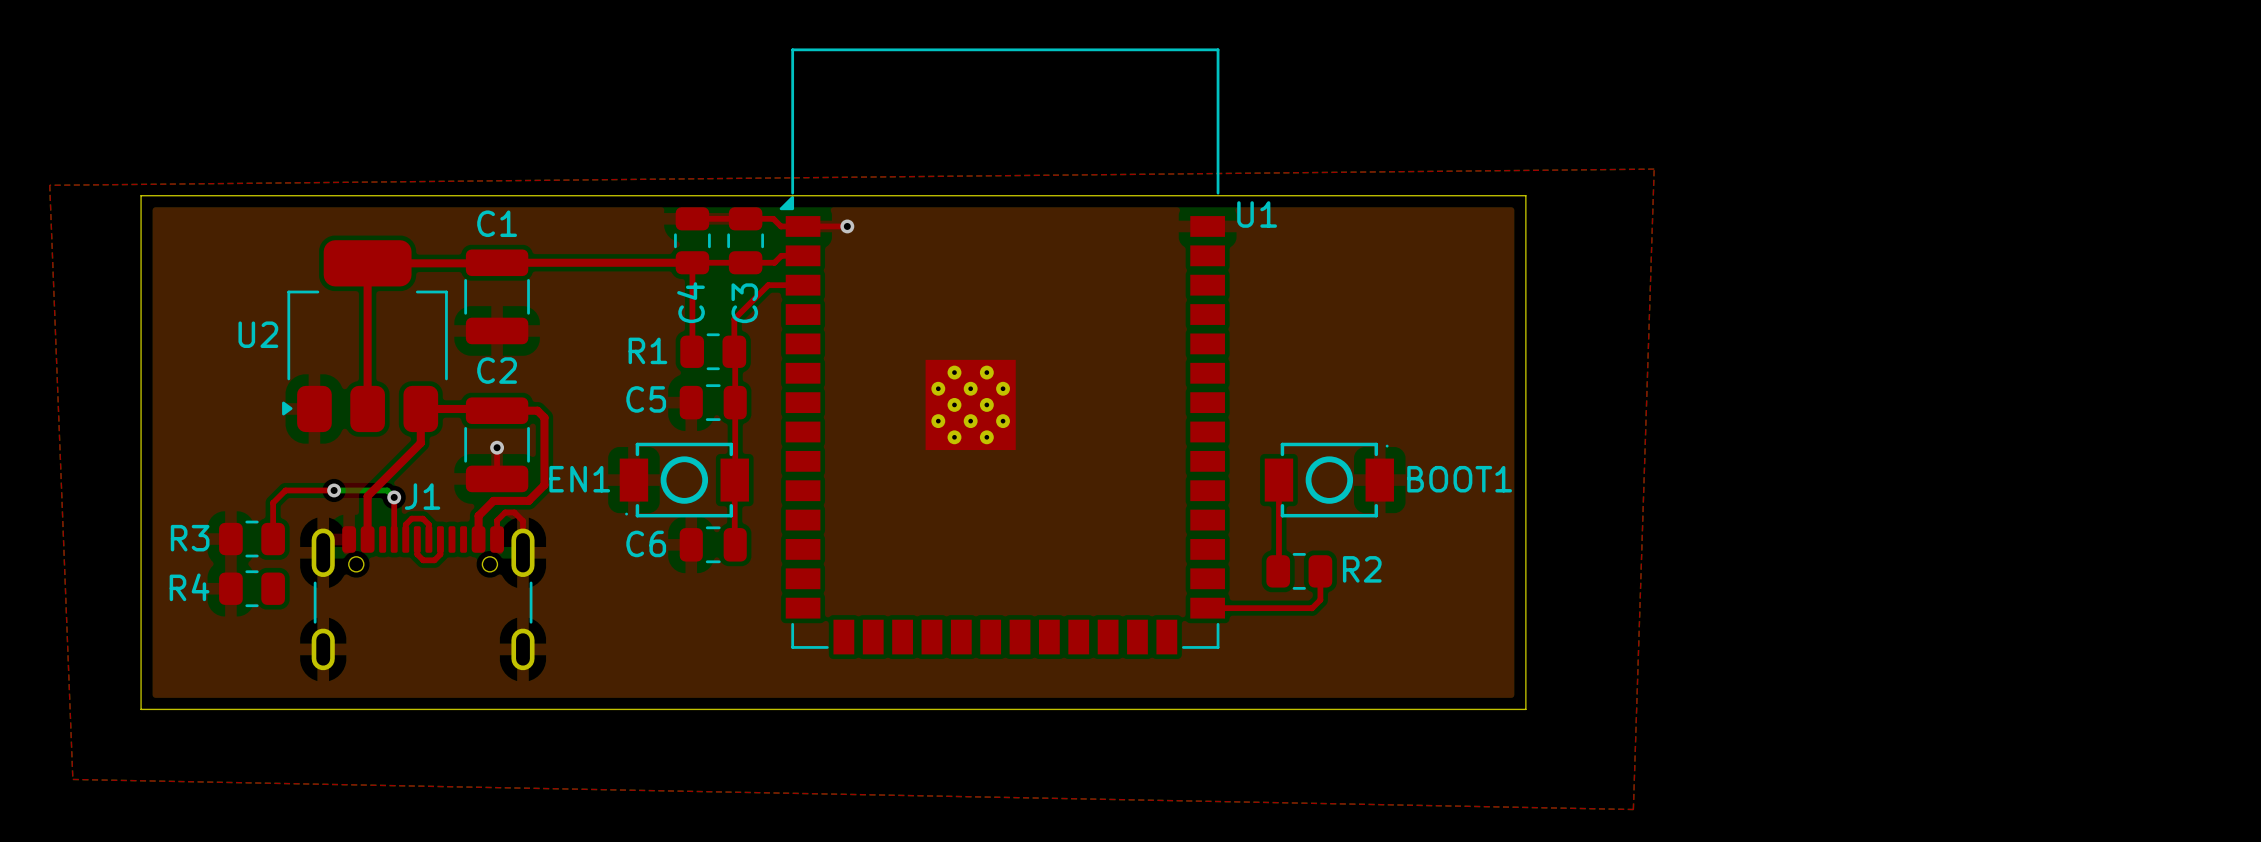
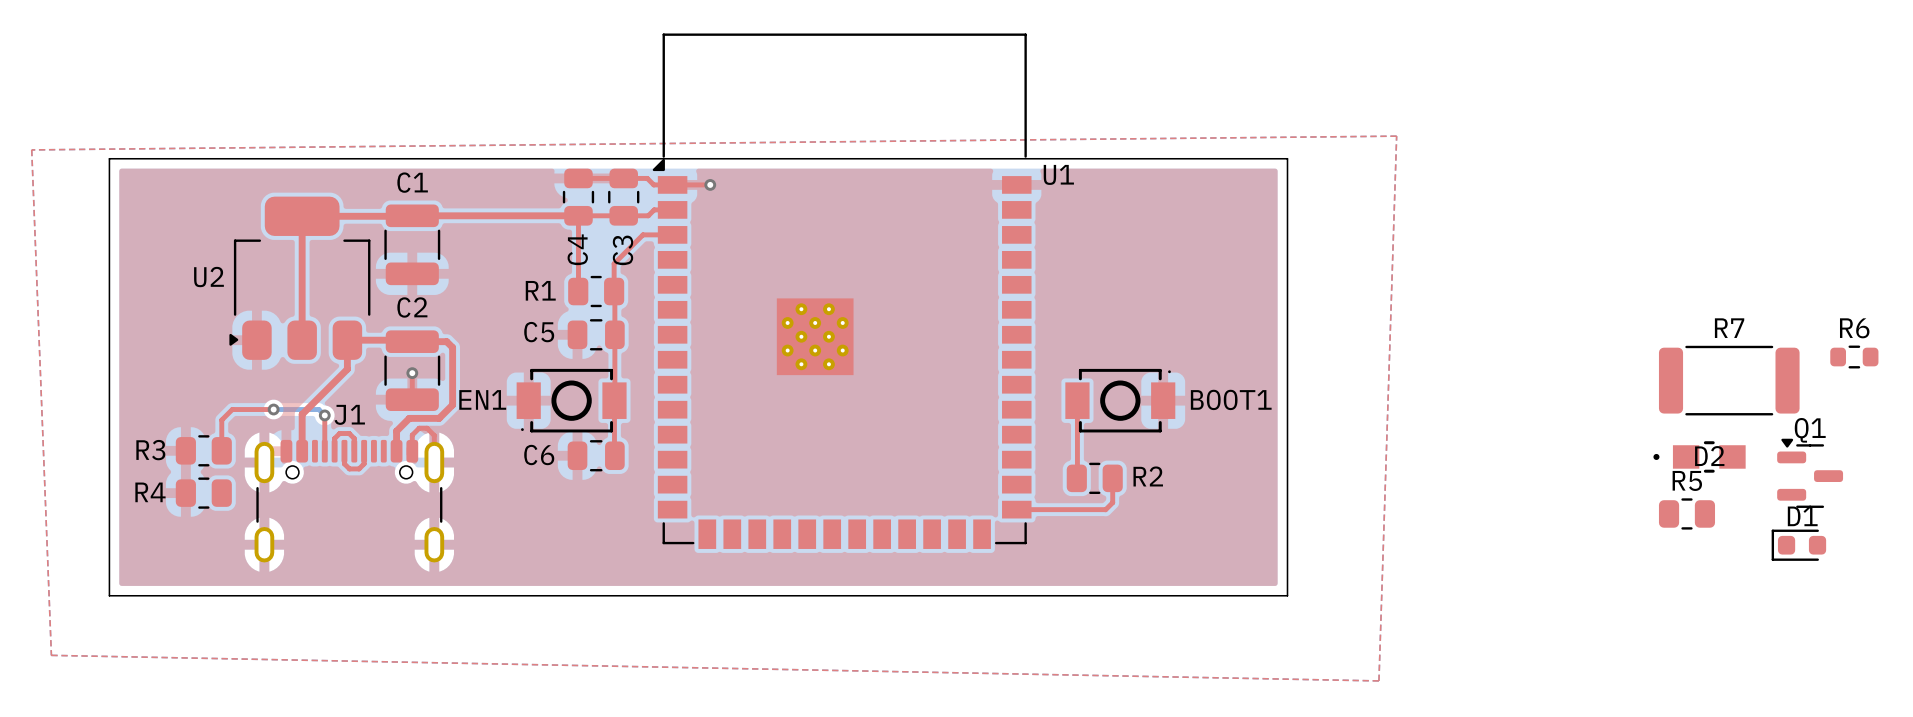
R6: none -> (1854, 357)
R7: none -> (1729, 380)
D2: none -> (1699, 456)
Q1: none -> (1810, 473)
R5: none -> (1686, 513)
D1: none -> (1798, 545)

